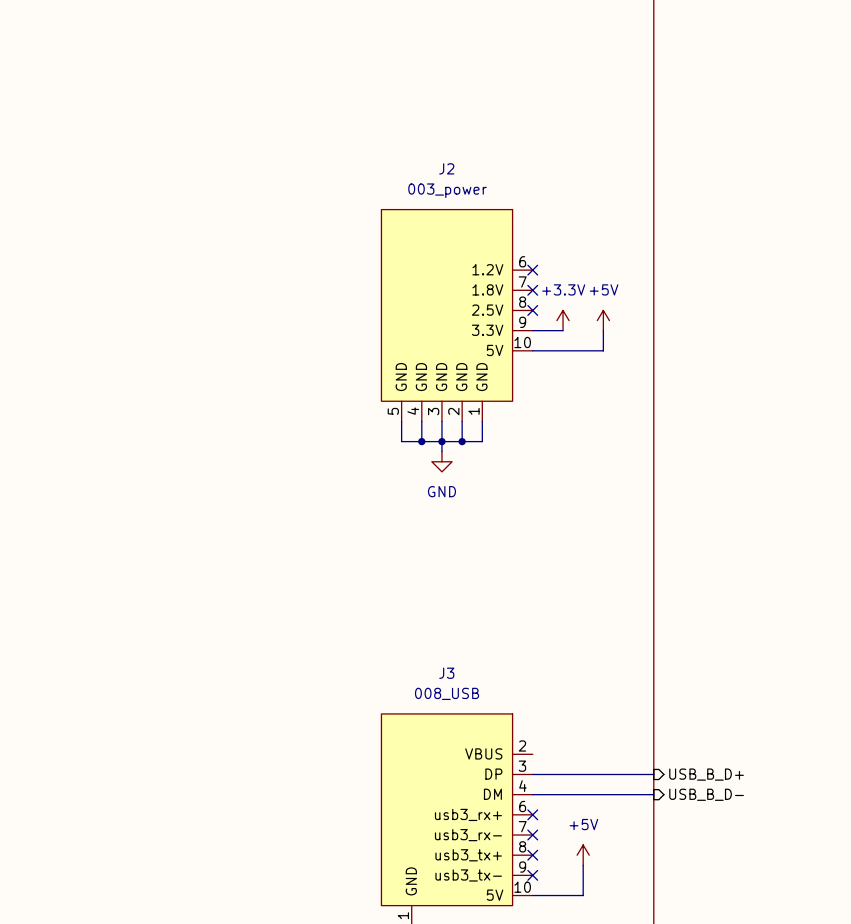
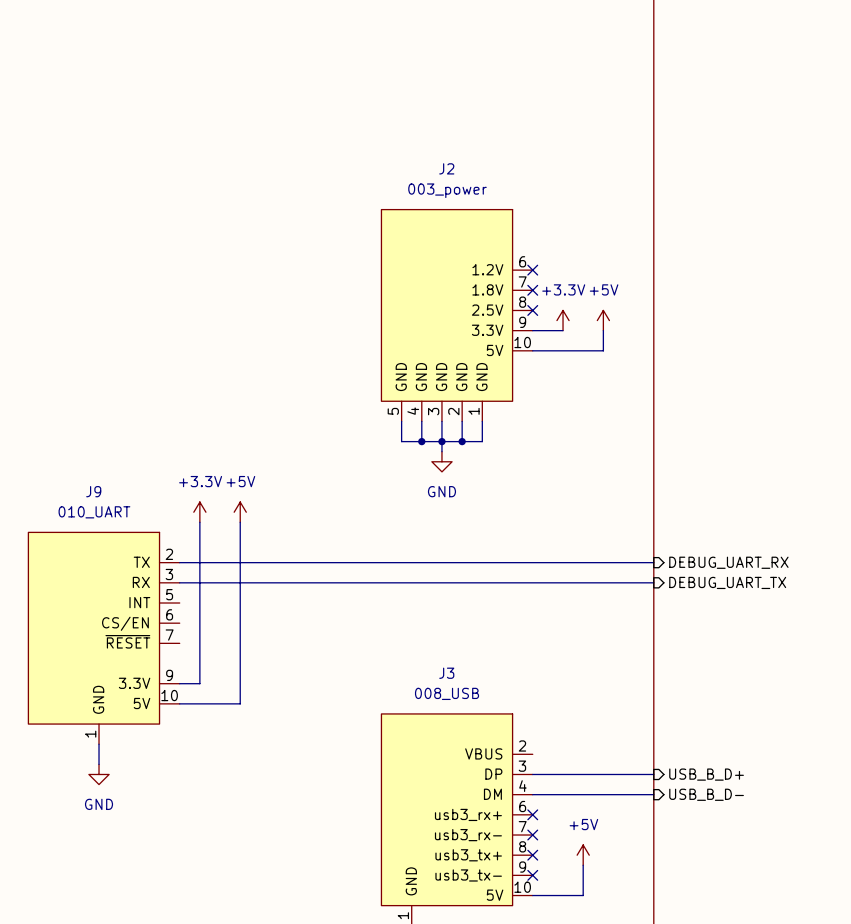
power symbol: none -> +3.3V (199, 512)
power symbol: none -> +5V (240, 512)
wire: none -> (199, 522) (199, 683) (179, 683)
wire: none -> (240, 522) (240, 703) (179, 703)
wire: none -> (179, 562) (653, 562)
sheet pin: none -> DEBUG_UART_RX (728, 562)
wire: none -> (179, 582) (653, 582)
sheet pin: none -> DEBUG_UART_TX (727, 582)
J9: none -> 010_UART (104, 638)
wire: none -> (99, 744) (99, 764)
power symbol: none -> GND (99, 774)

